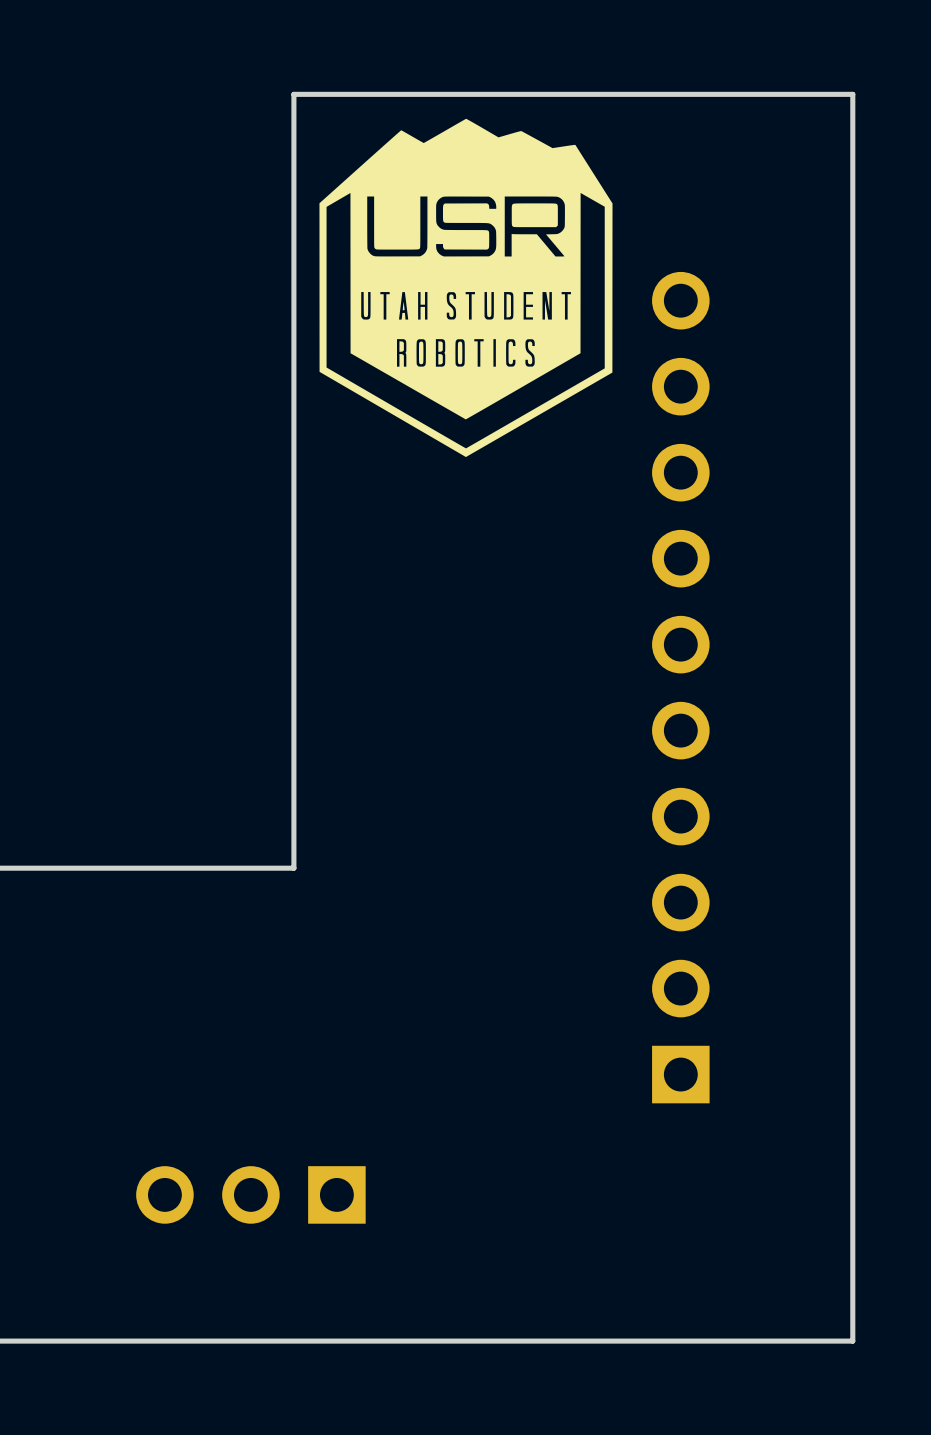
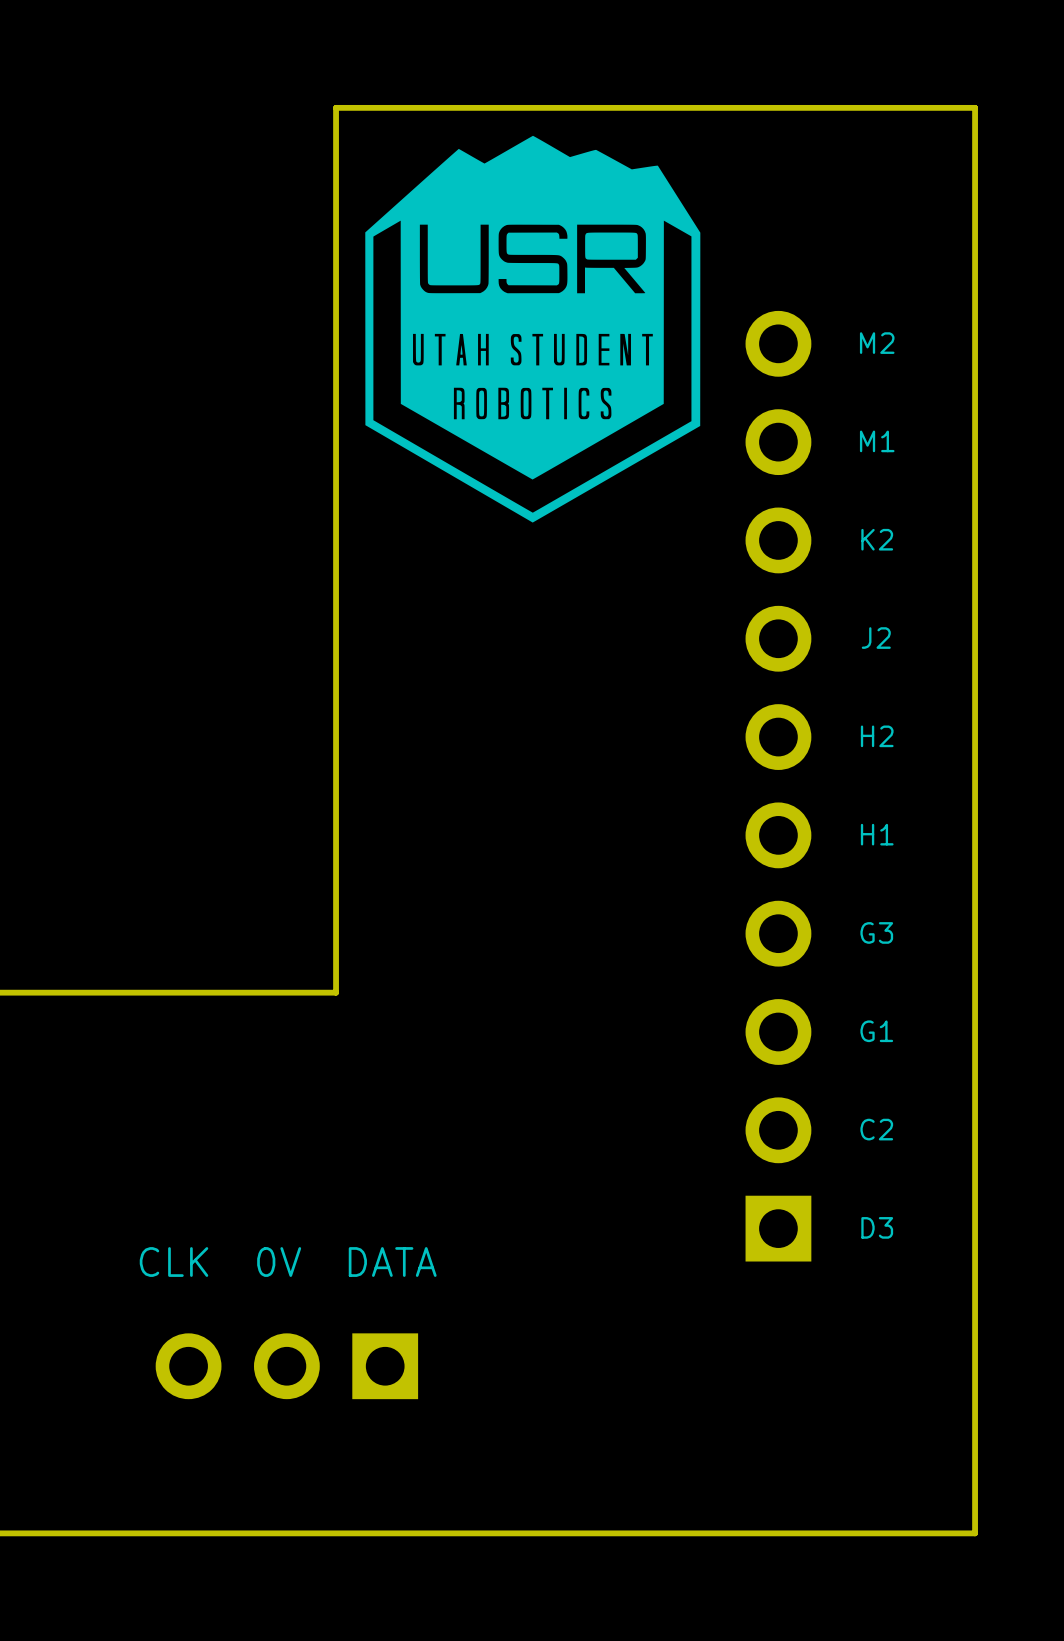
text: none -> M2 (877, 343)
text: none -> M1 (877, 441)
text: none -> K2 (877, 539)
text: none -> J2 (876, 638)
text: none -> H2 (877, 736)
text: none -> H1 (877, 834)
text: none -> G3 (876, 932)
text: none -> G1 (876, 1031)
text: none -> C2 (876, 1129)
text: none -> D3 (877, 1227)
text: none -> CLK 0V DATA (288, 1262)

